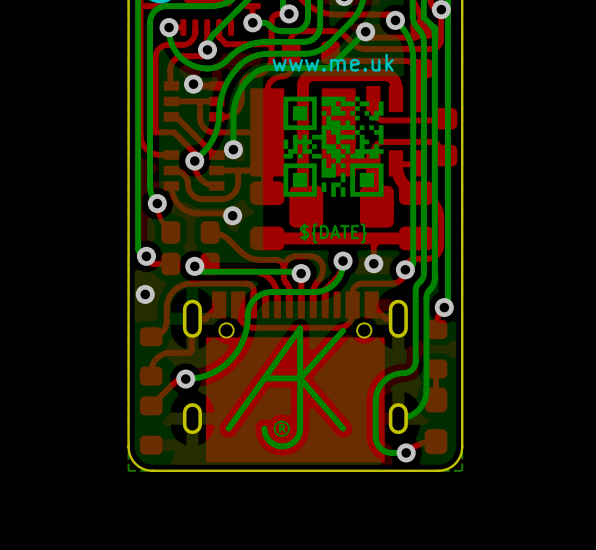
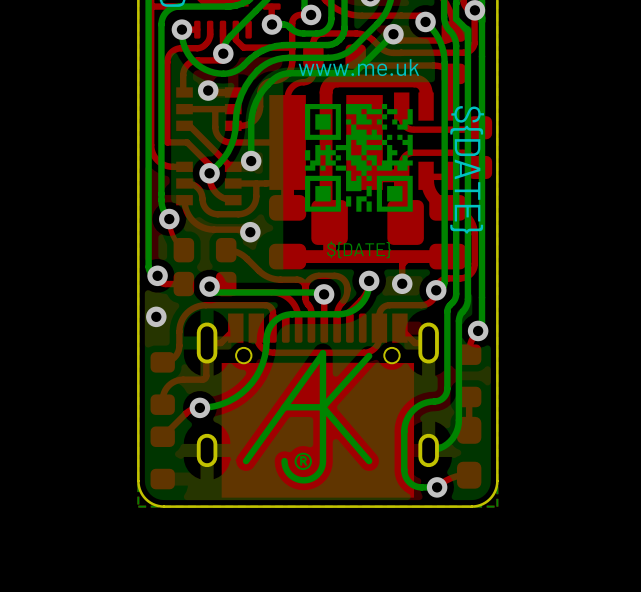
text: none -> ${DATE} (467, 169)

